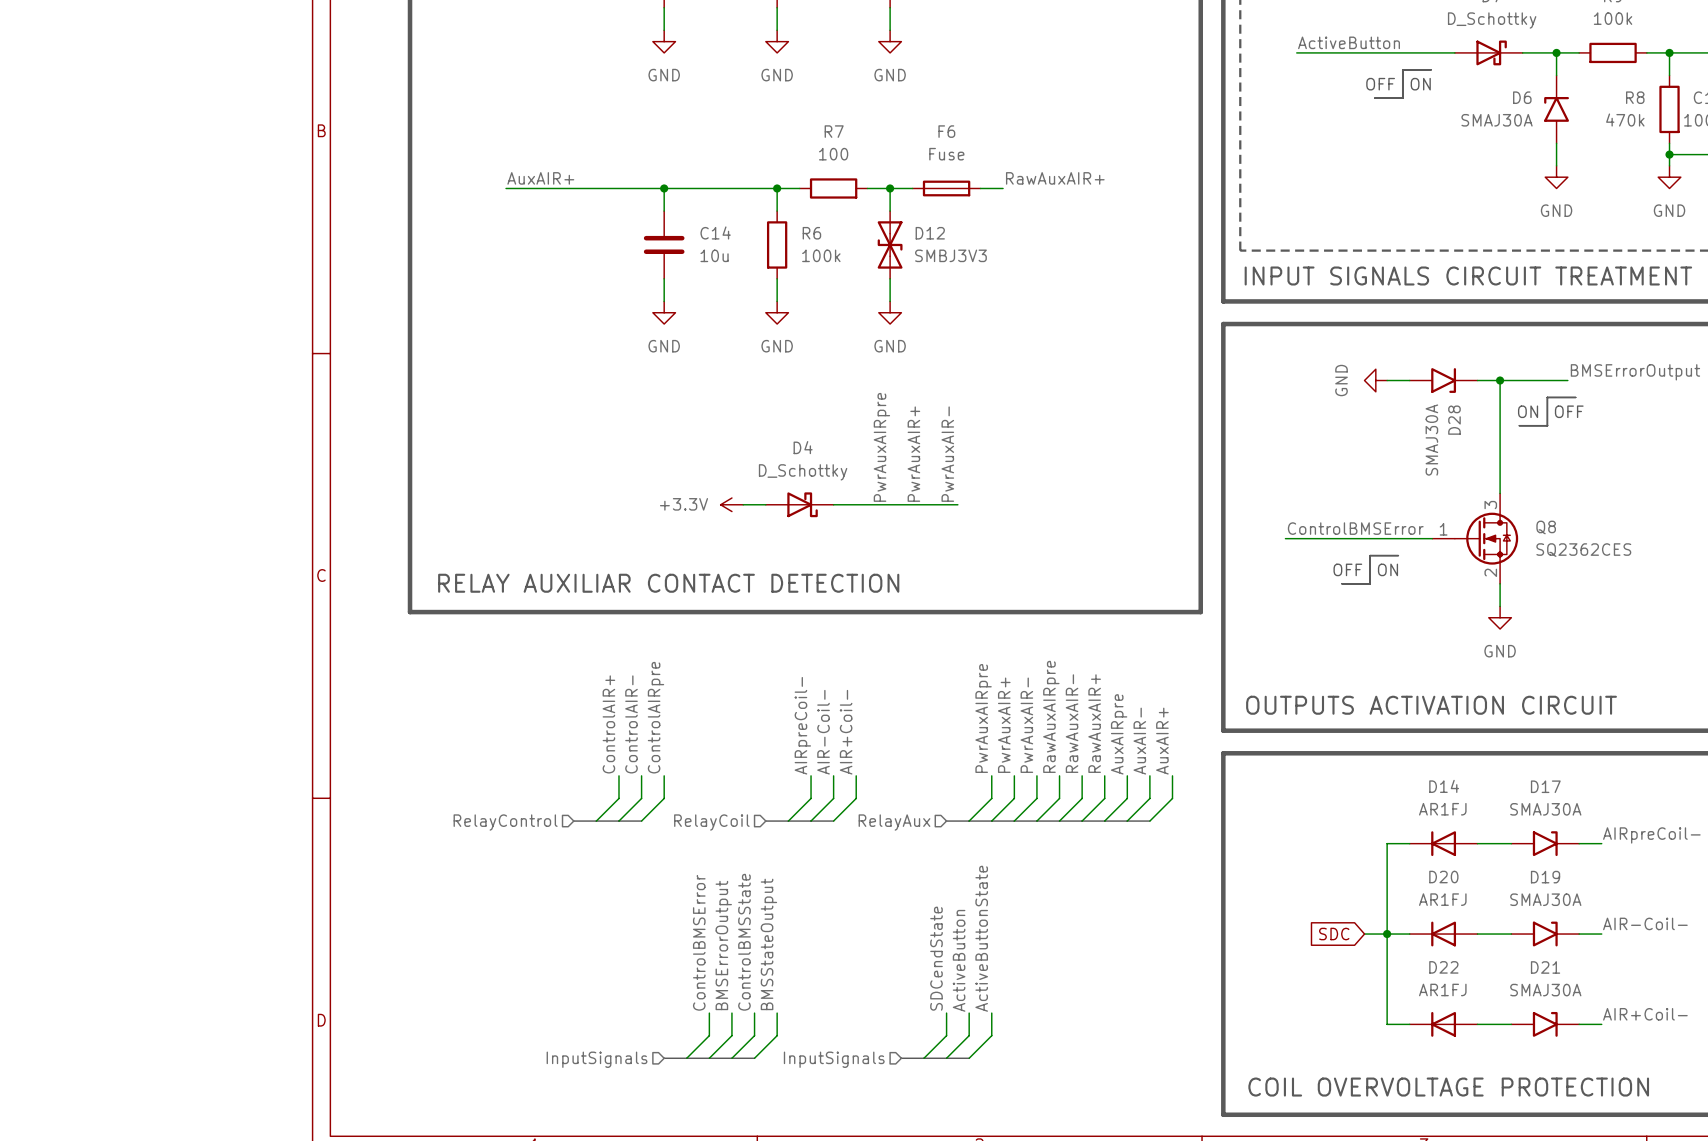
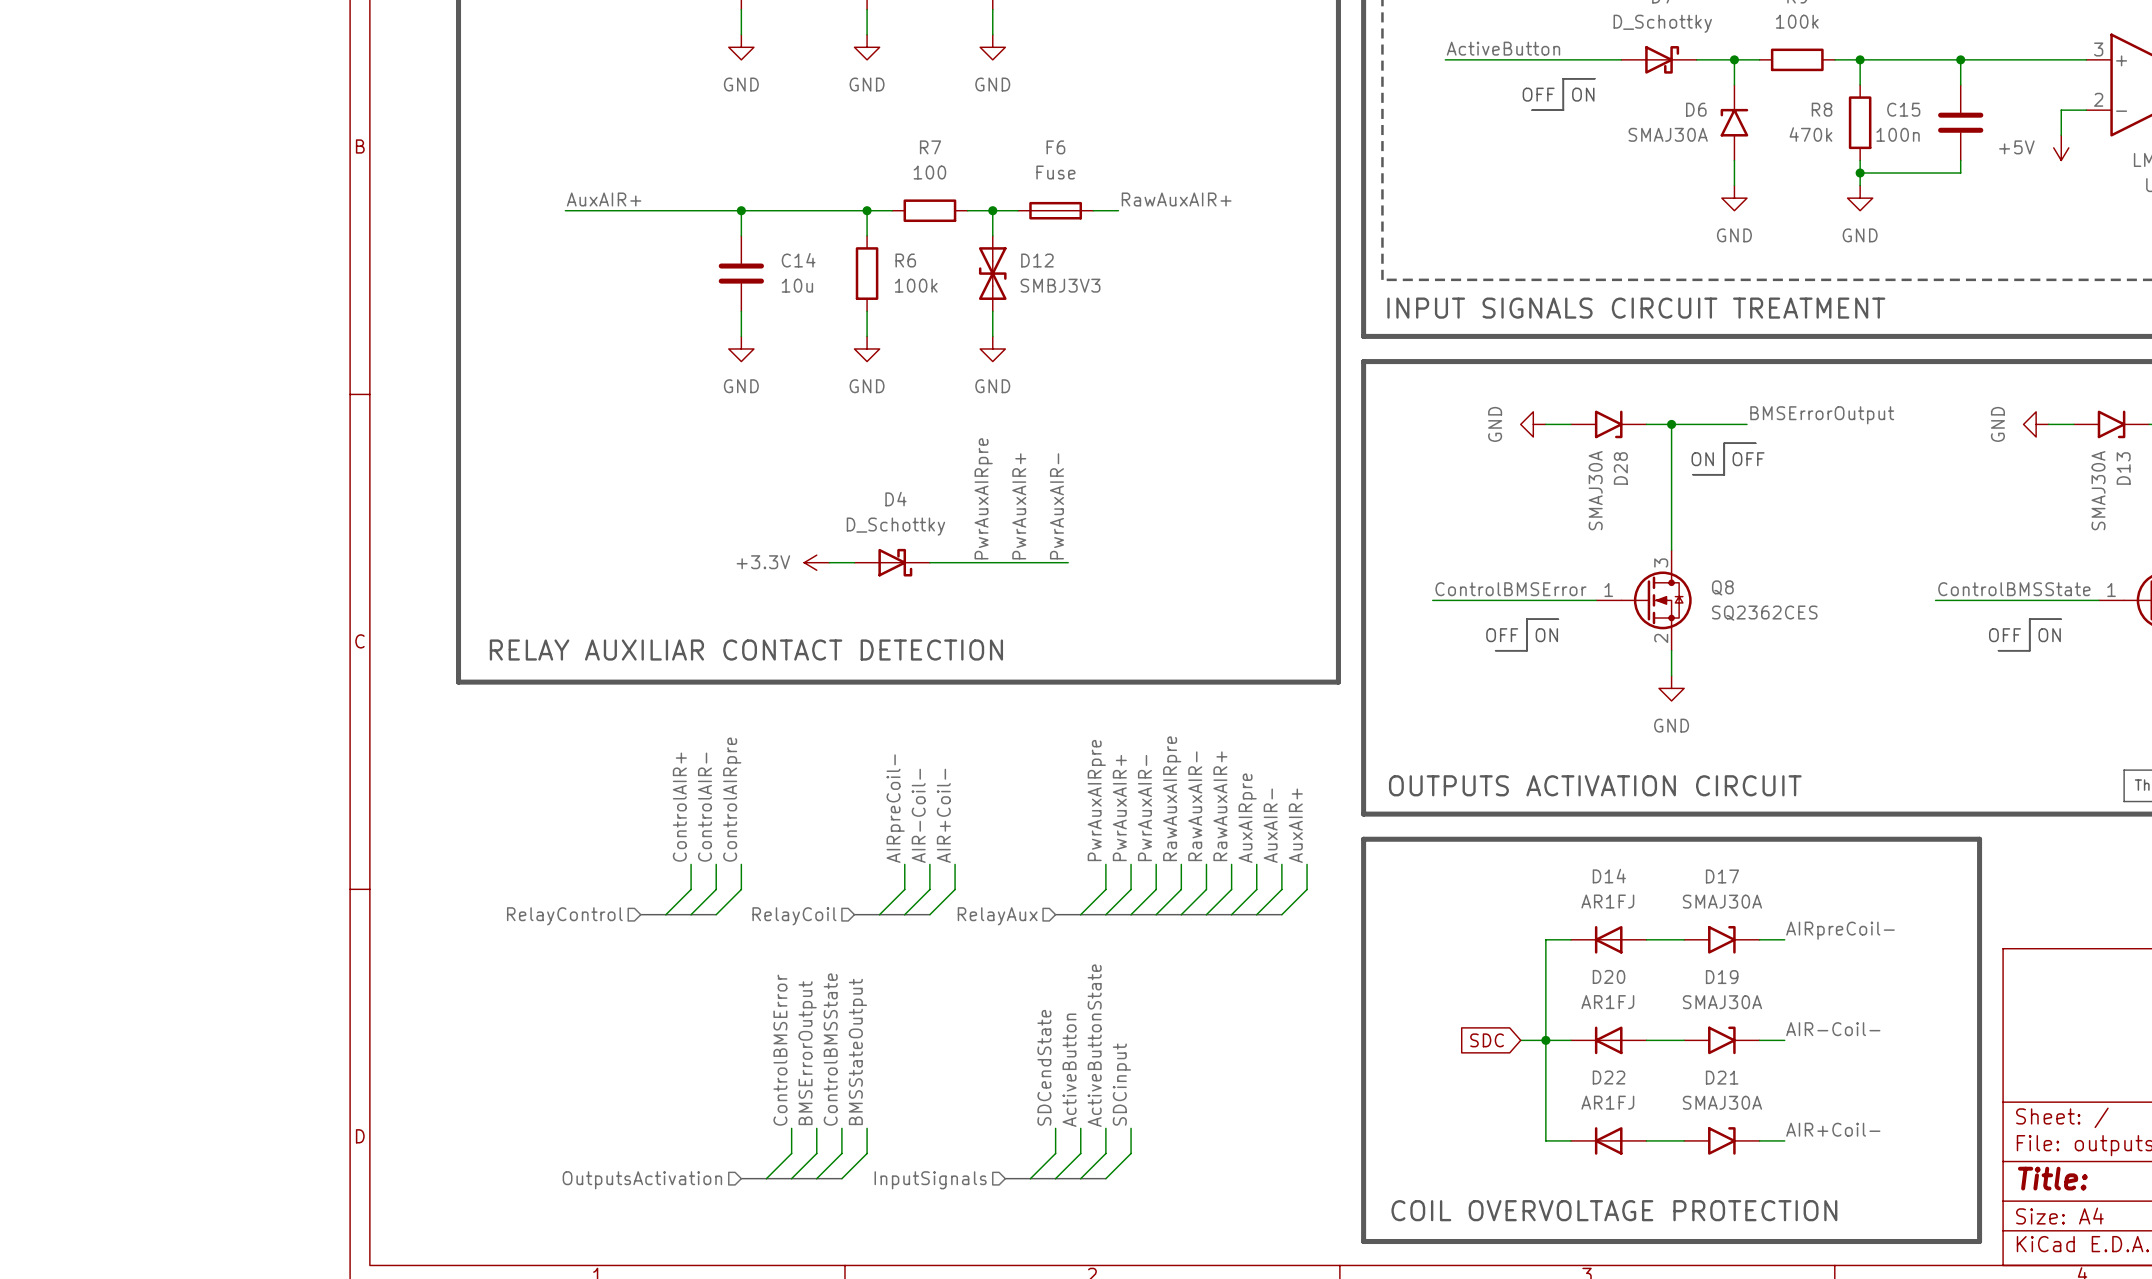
label: none -> SDCinput (1121, 1084)
wire: none -> (1131, 1128) (1131, 1153) (1105, 1178)
bus: none -> (1080, 1178) (1105, 1178)
hierarchical label: InputSignals (597, 1059) -> OutputsActivation (642, 1180)

